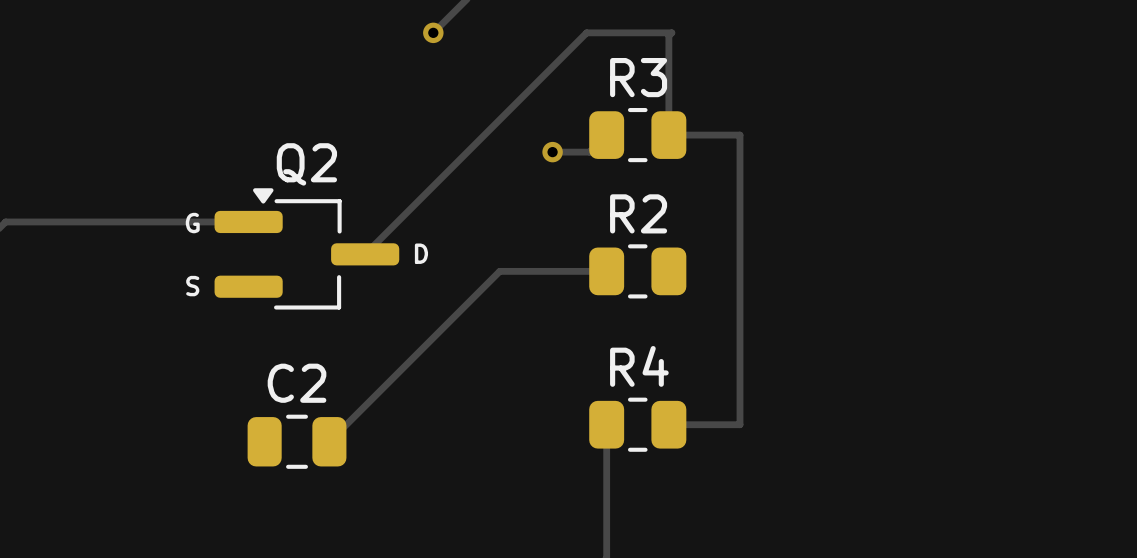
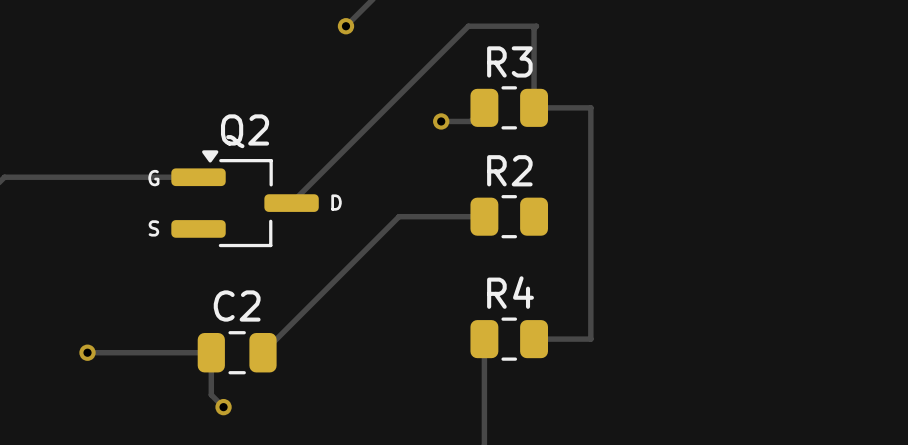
track: none -> (87, 352) (211, 352) (211, 394) (223, 407)
via: none -> (87, 352)
via: none -> (223, 407)

